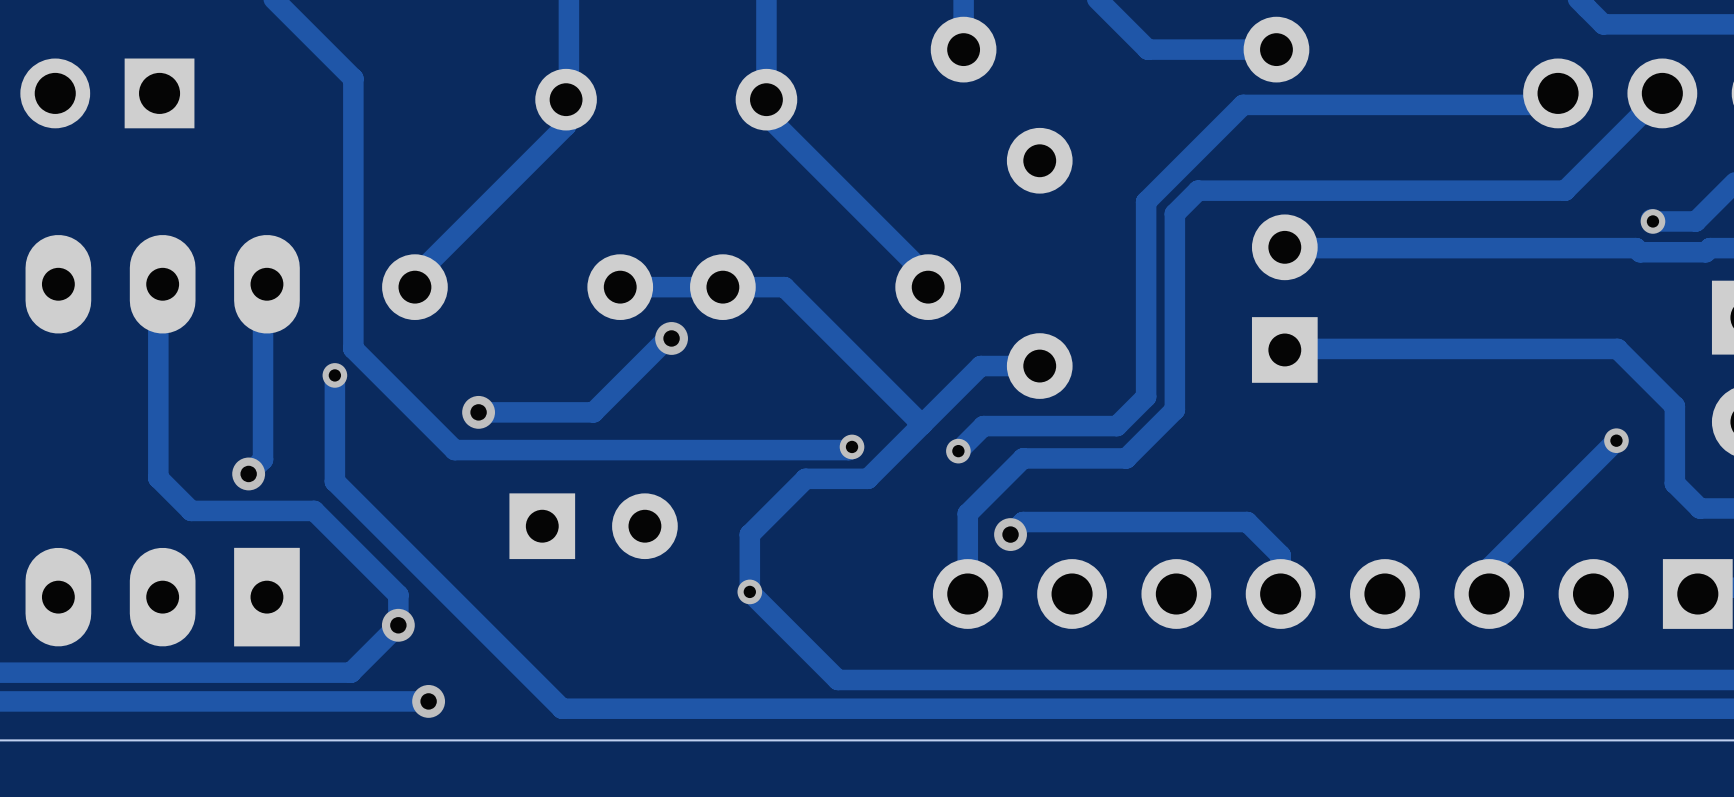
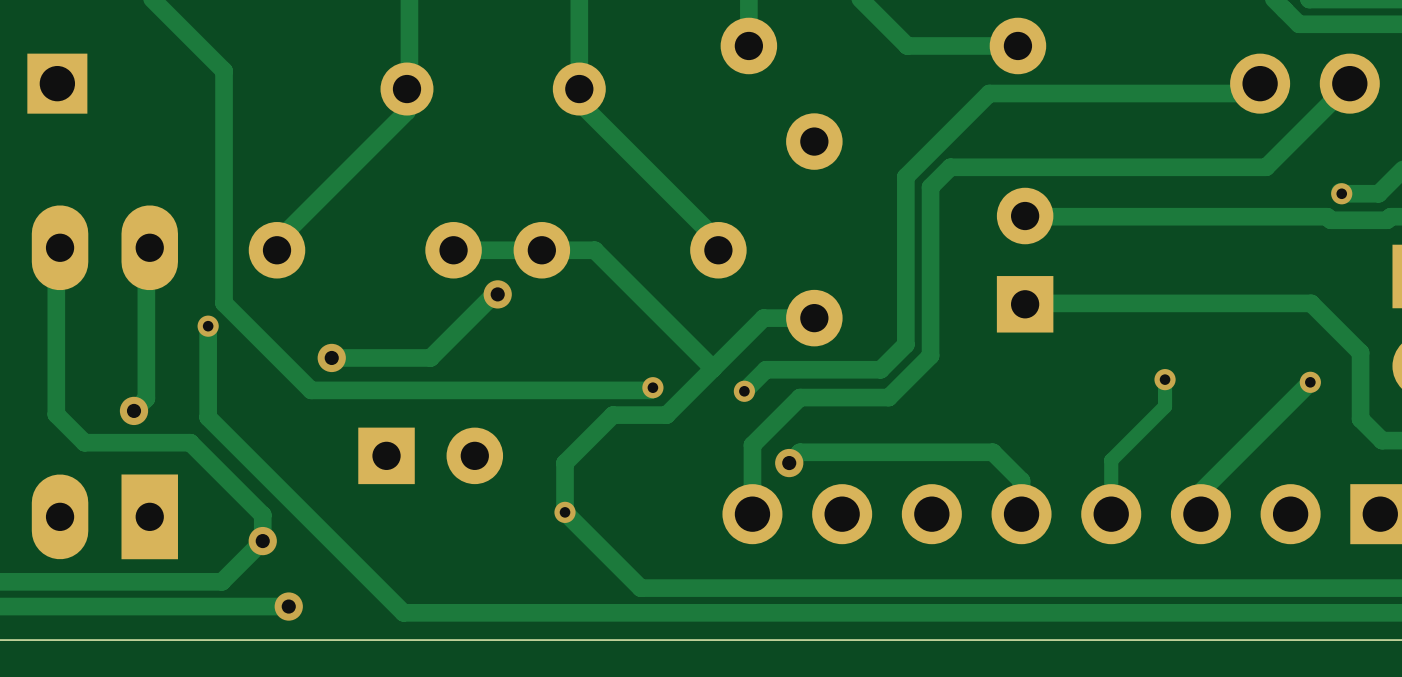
track: none -> (1165, 379) (1165, 406) (1111, 460) (1111, 514)
via: none -> (1165, 379)

